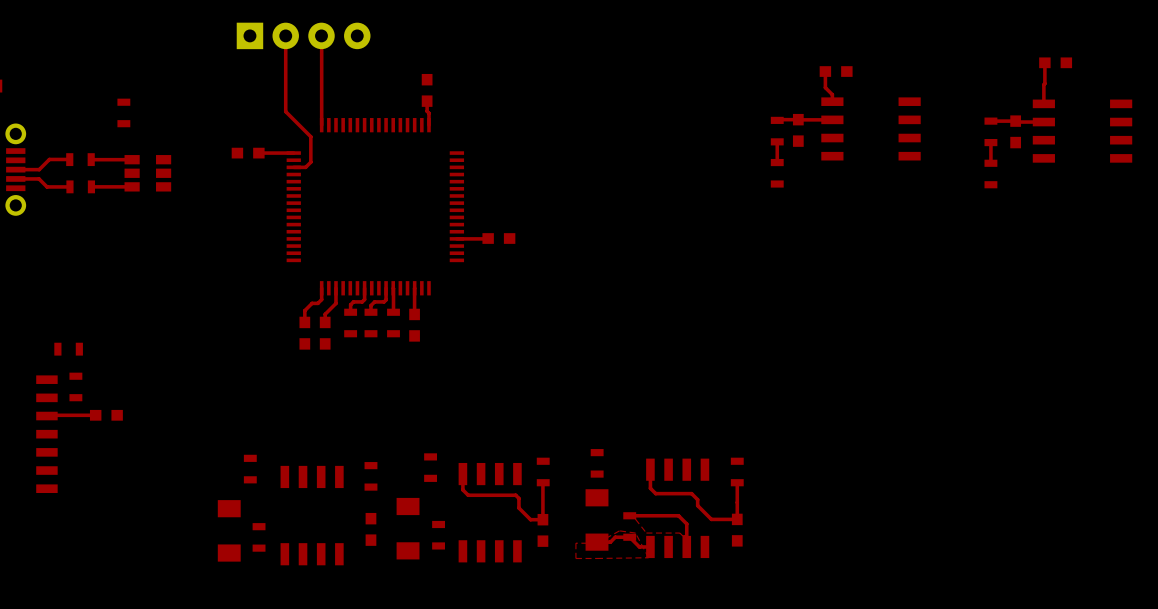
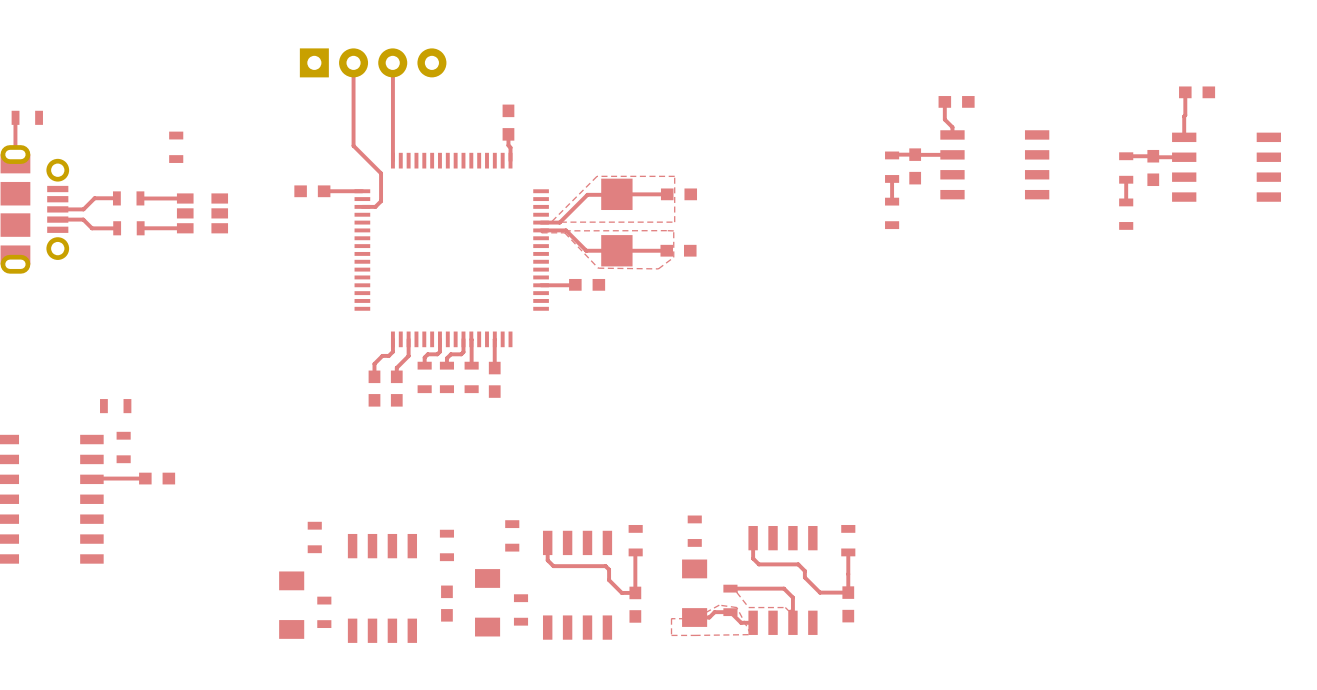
top zone outline: none -> (674, 176) (674, 222) (551, 222) (597, 176) (674, 176)
top track: none -> (667, 194) (587, 194) (559, 222) (541, 222)
part: none -> (678, 194)
part: none -> (616, 222)
top track: none -> (541, 230) (565, 230) (586, 250) (666, 250)
top zone outline: none -> (542, 230) (673, 230) (673, 257) (658, 268) (598, 268) (564, 232) (541, 232) (542, 230)
part: none -> (678, 250)

